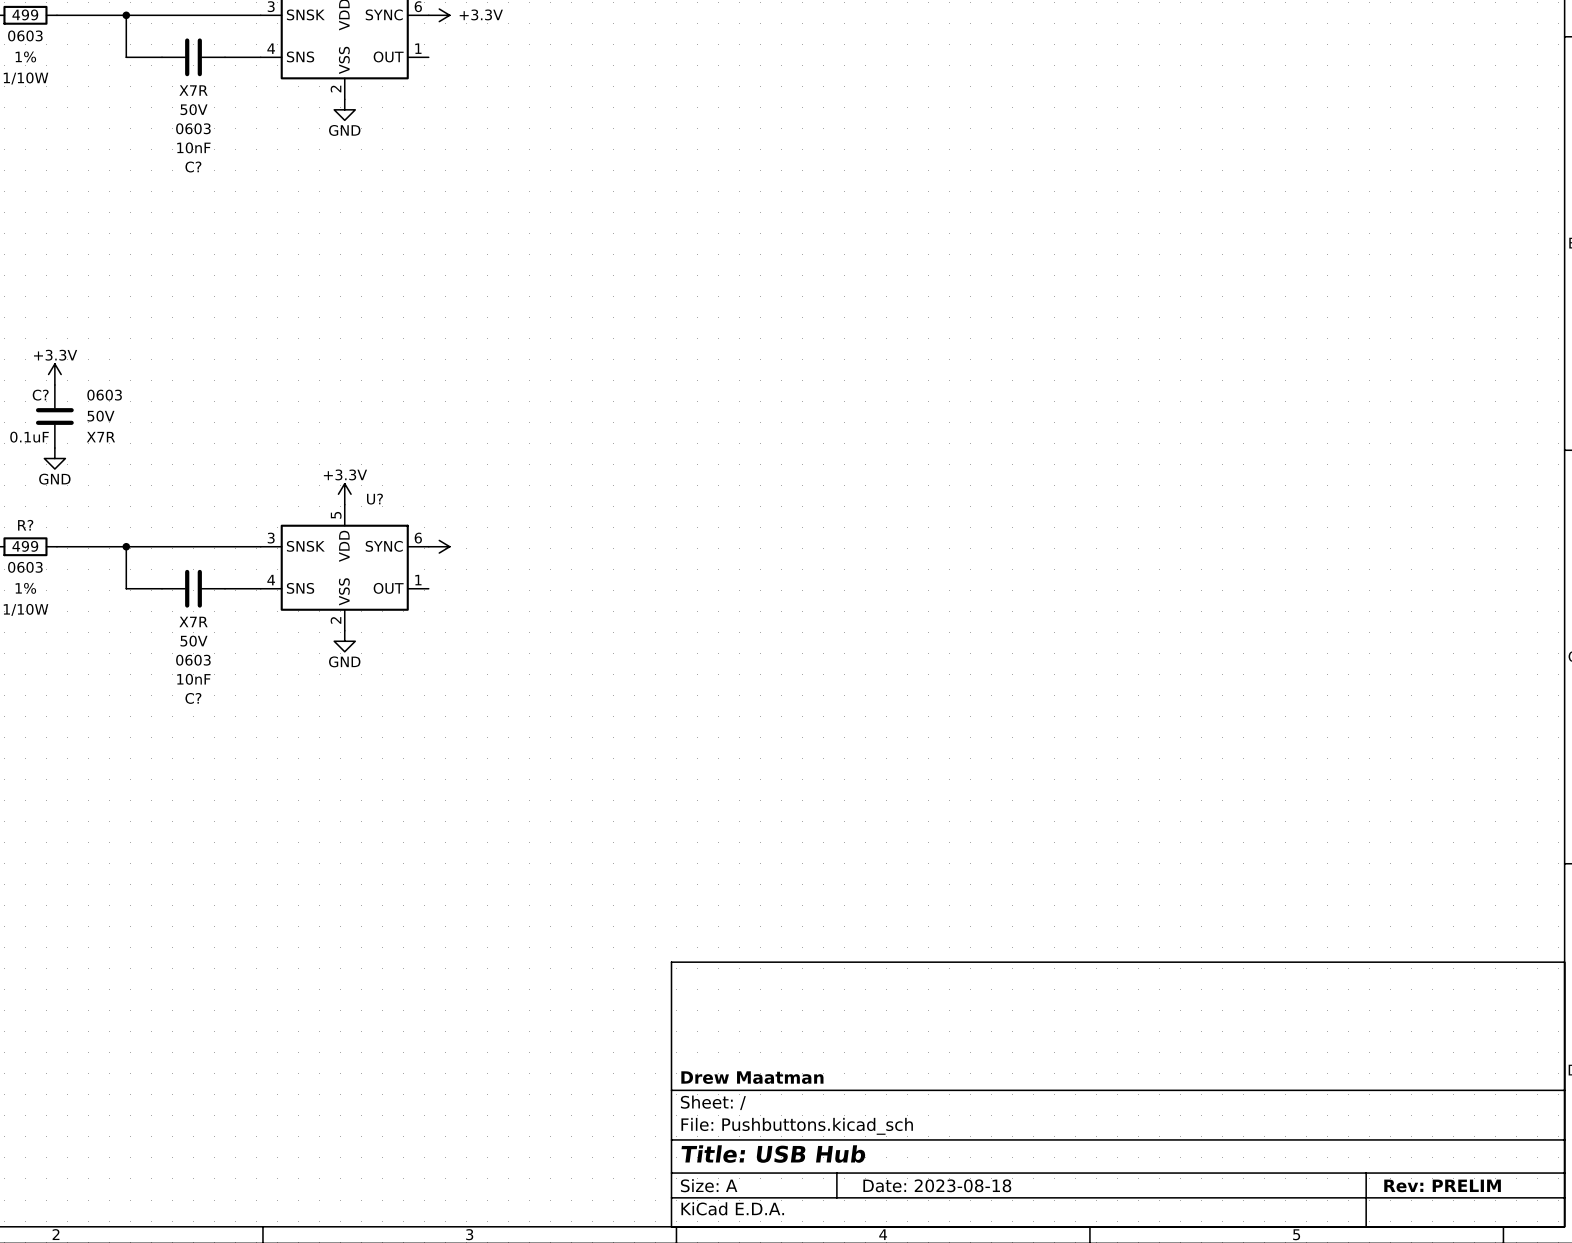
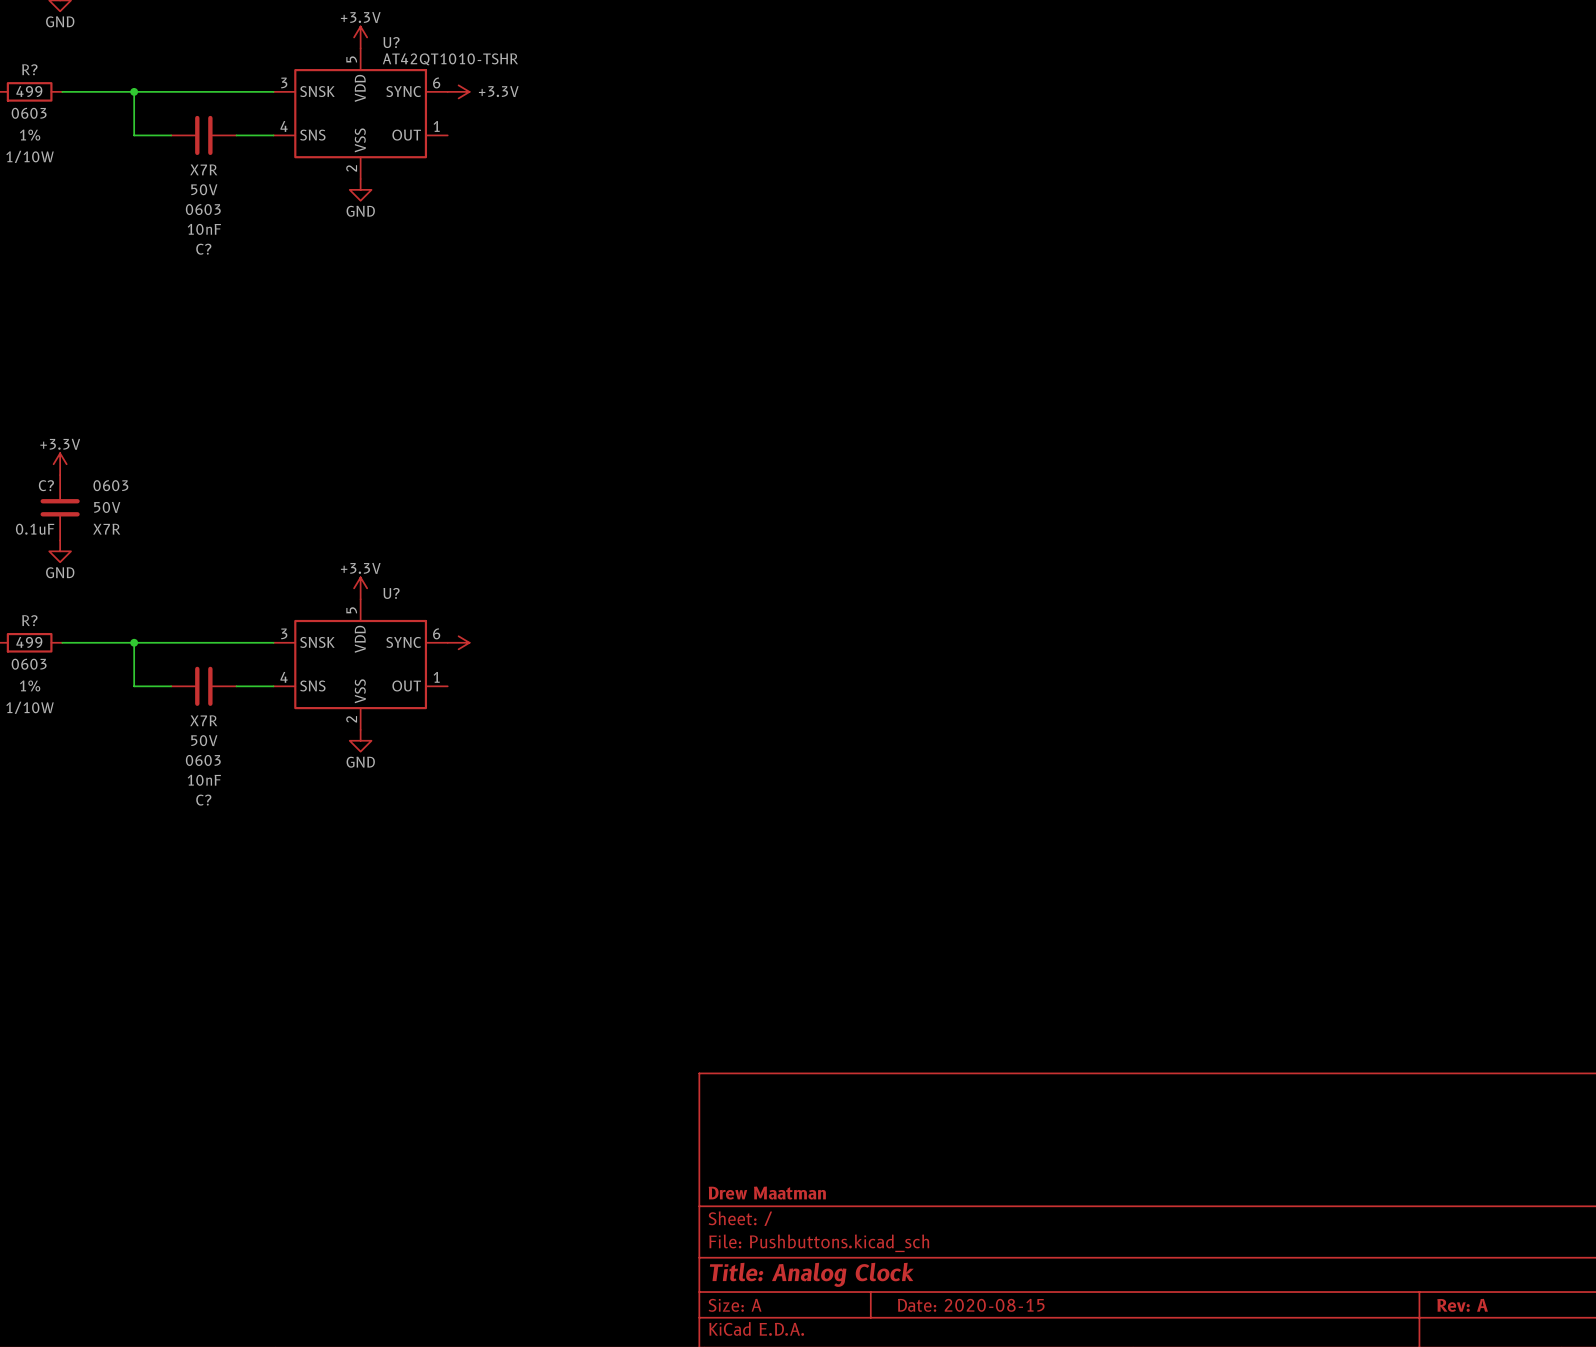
title block: Title: USB Hub (773, 1154) -> Title: Analog Clock (811, 1274)
title block: Date: 2023-08-18 (937, 1185) -> Date: 2020-08-15 (971, 1305)
title block: Rev: PRELIM (1442, 1185) -> Rev: A (1462, 1305)

